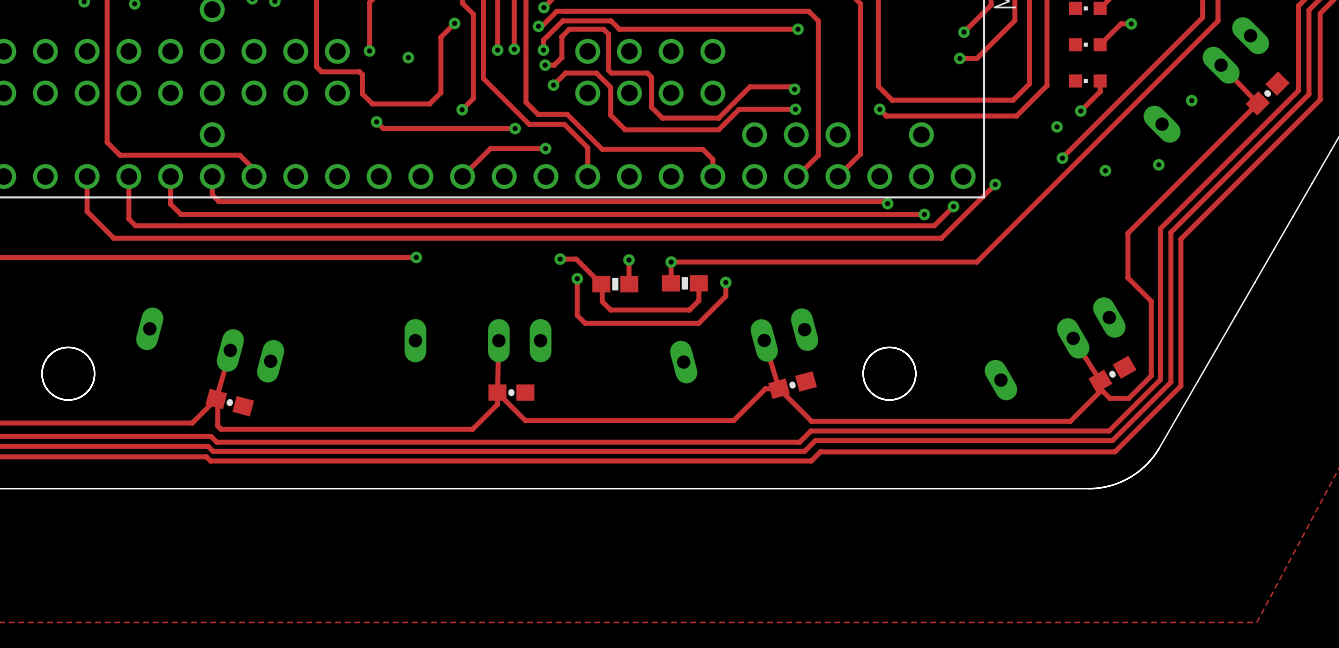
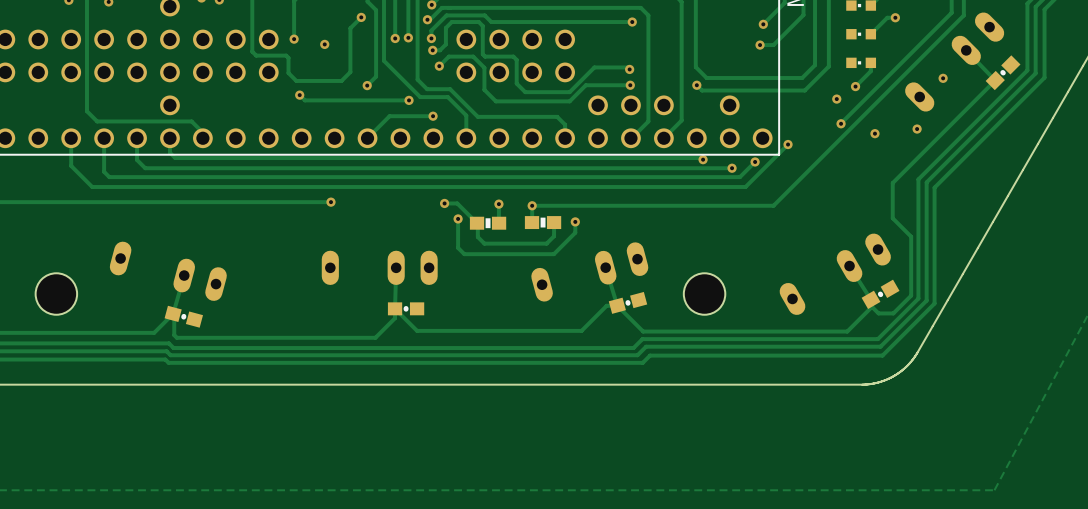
board edge: (67, 347) (57, 349) (49, 355) (43, 364) (42, 374) (44, 384) (50, 392) (58, 398) (69, 399) (79, 397) (87, 391) (92, 383) (94, 372) (92, 362) (86, 354) (77, 349) (67, 347) -> none
board edge: (888, 347) (878, 349) (870, 355) (864, 364) (863, 374) (865, 384) (871, 392) (880, 398) (890, 399) (900, 397) (908, 391) (914, 383) (915, 372) (913, 362) (907, 354) (898, 349) (888, 347) -> none
hole: none -> (56, 294)
hole: none -> (704, 294)

